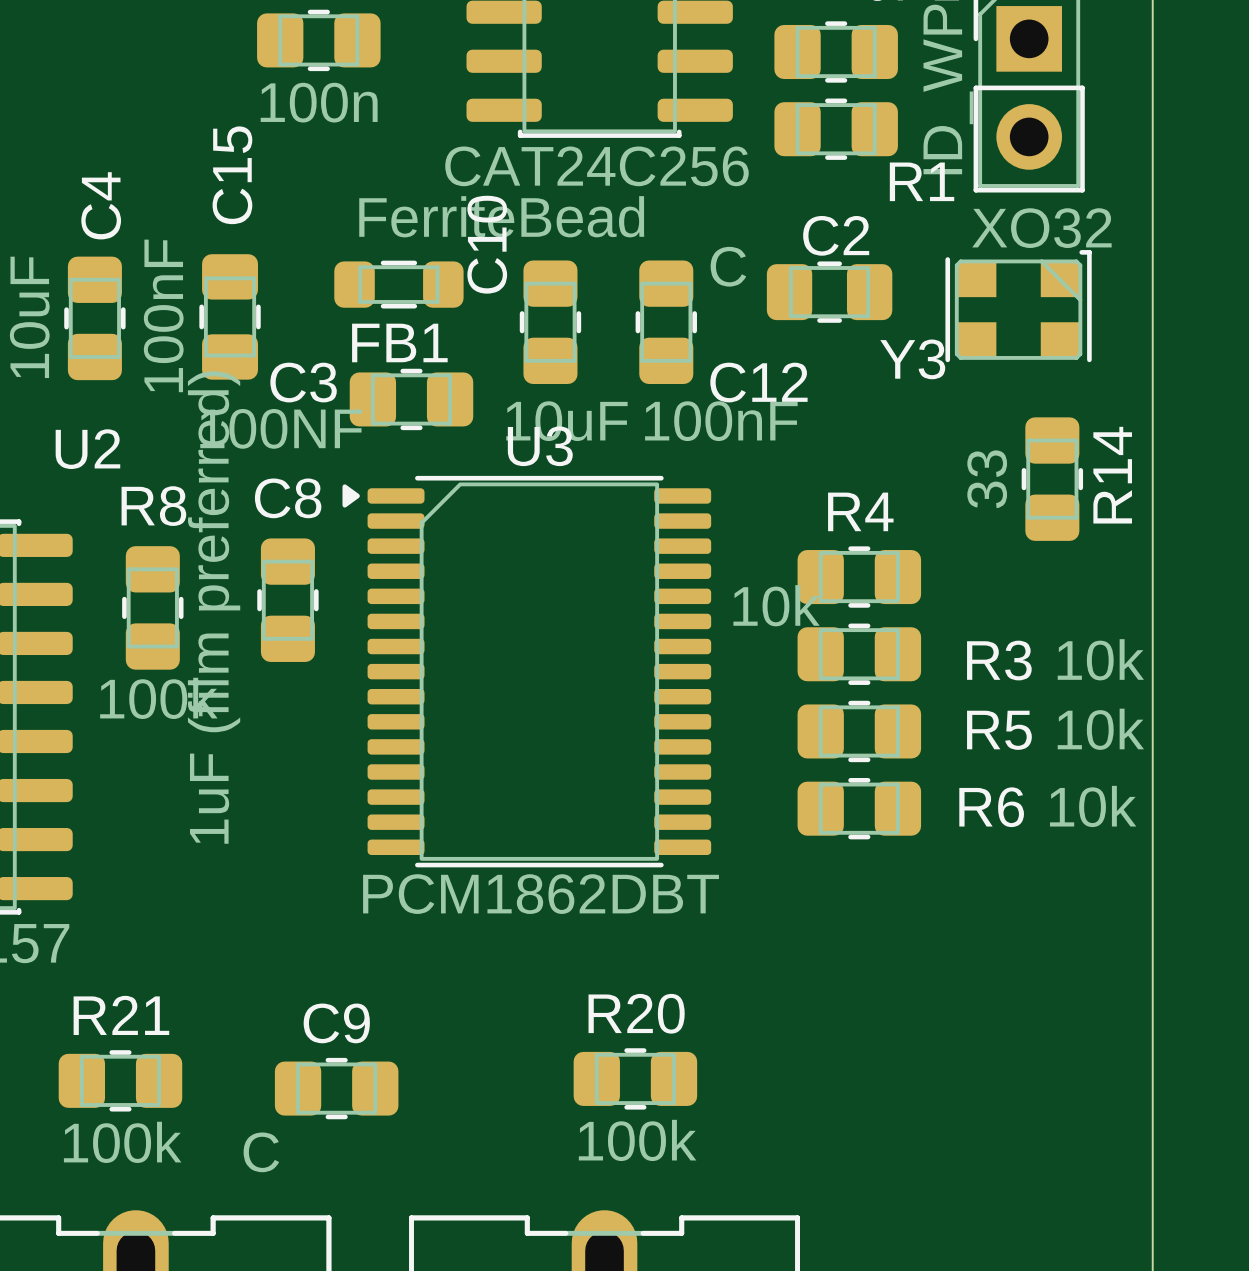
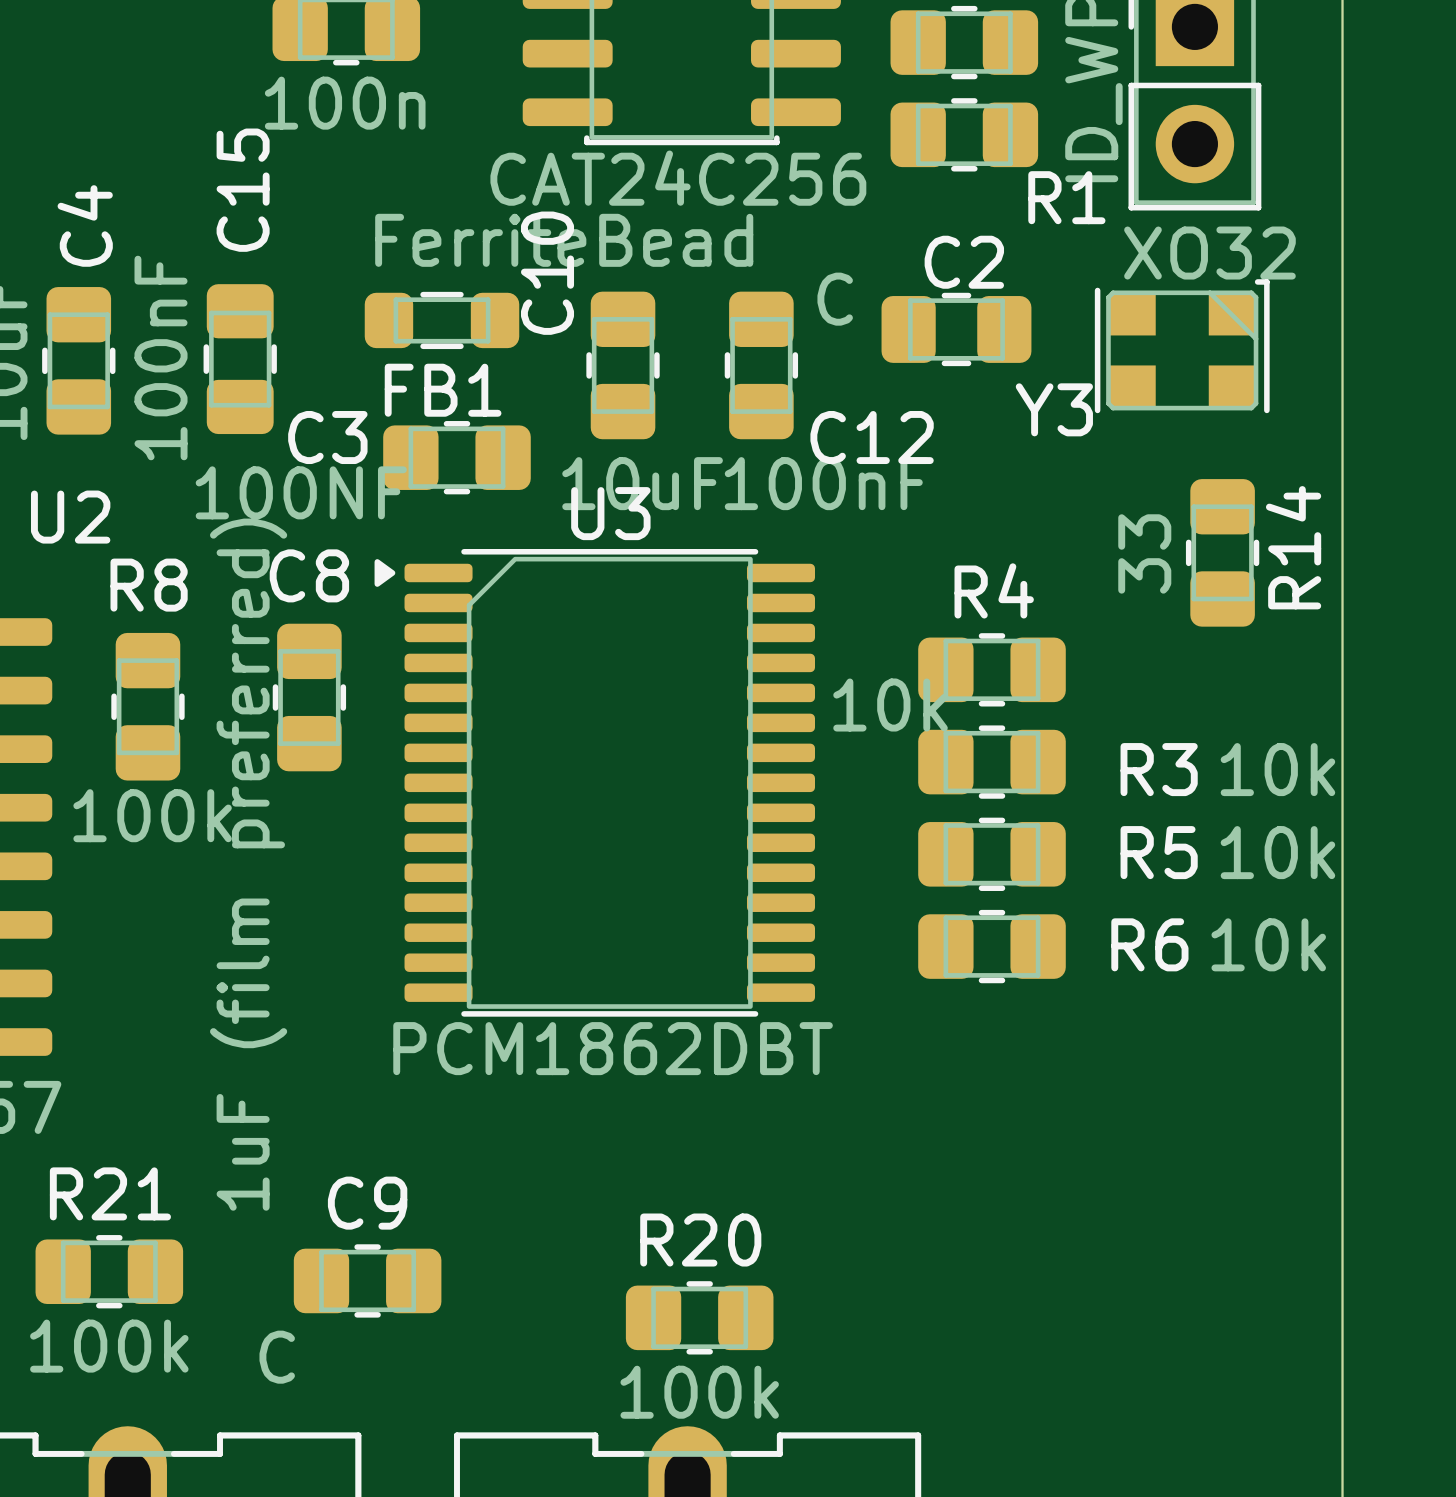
C8 value position: 1uF (film preferred) (214, 607) -> 1uF (film preferred) (248, 864)
R20 position: (635, 1078) -> (699, 1317)

